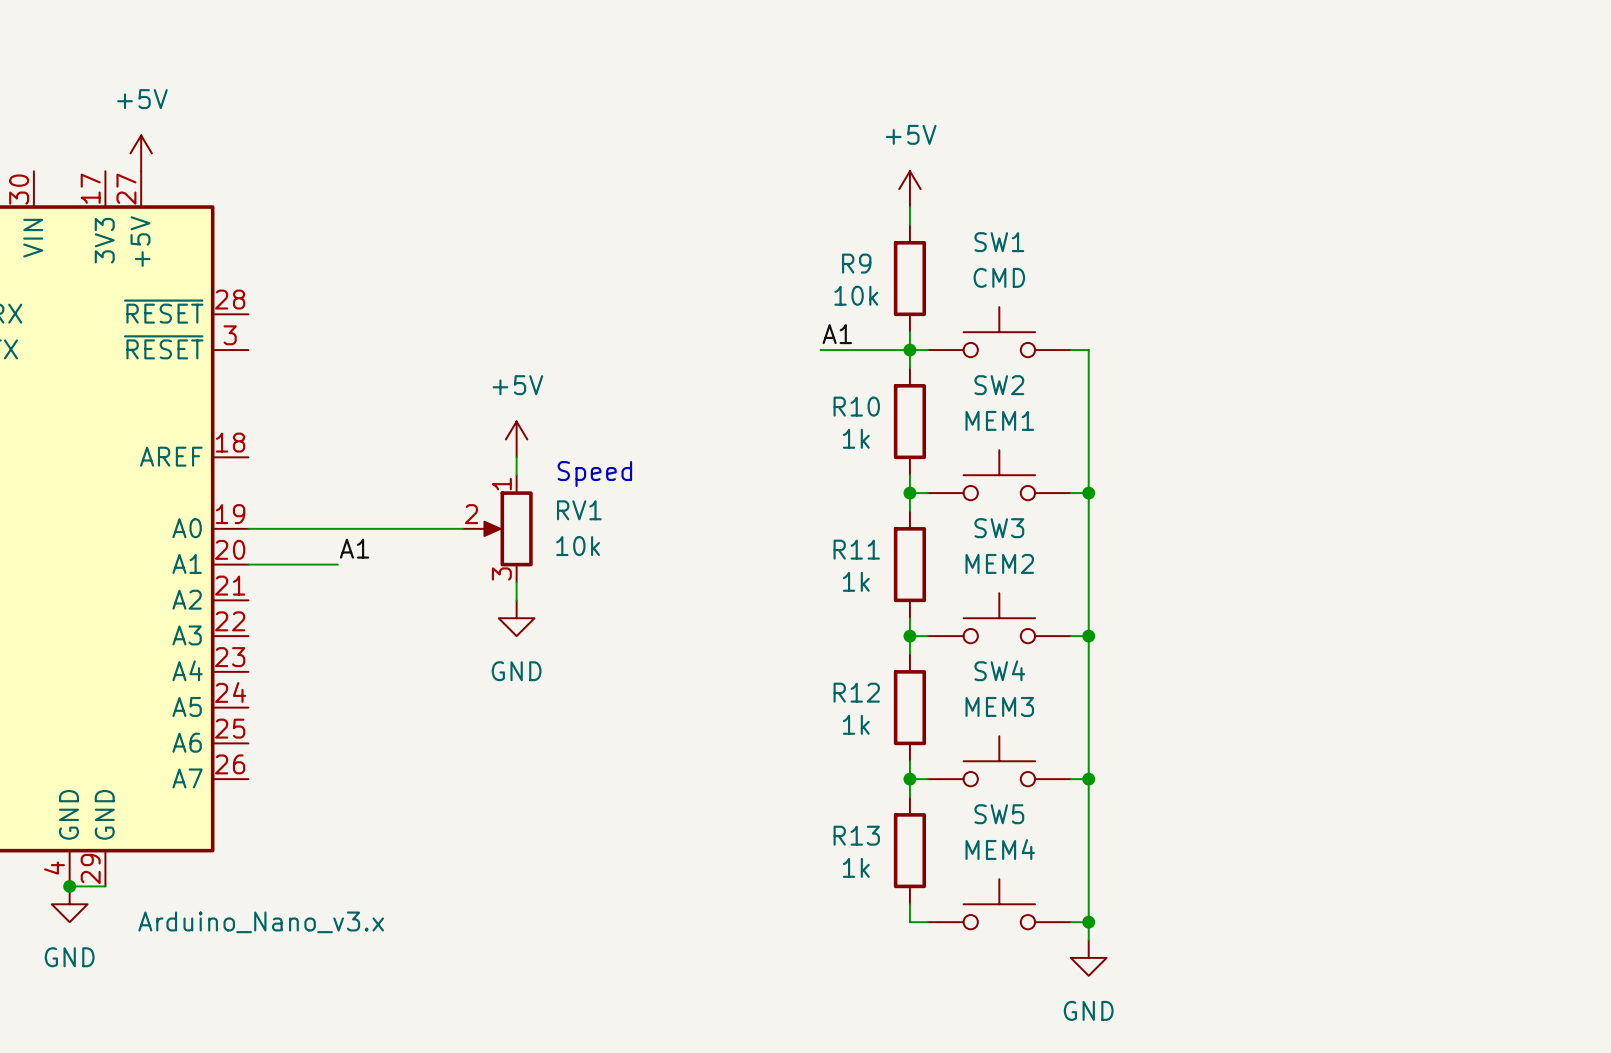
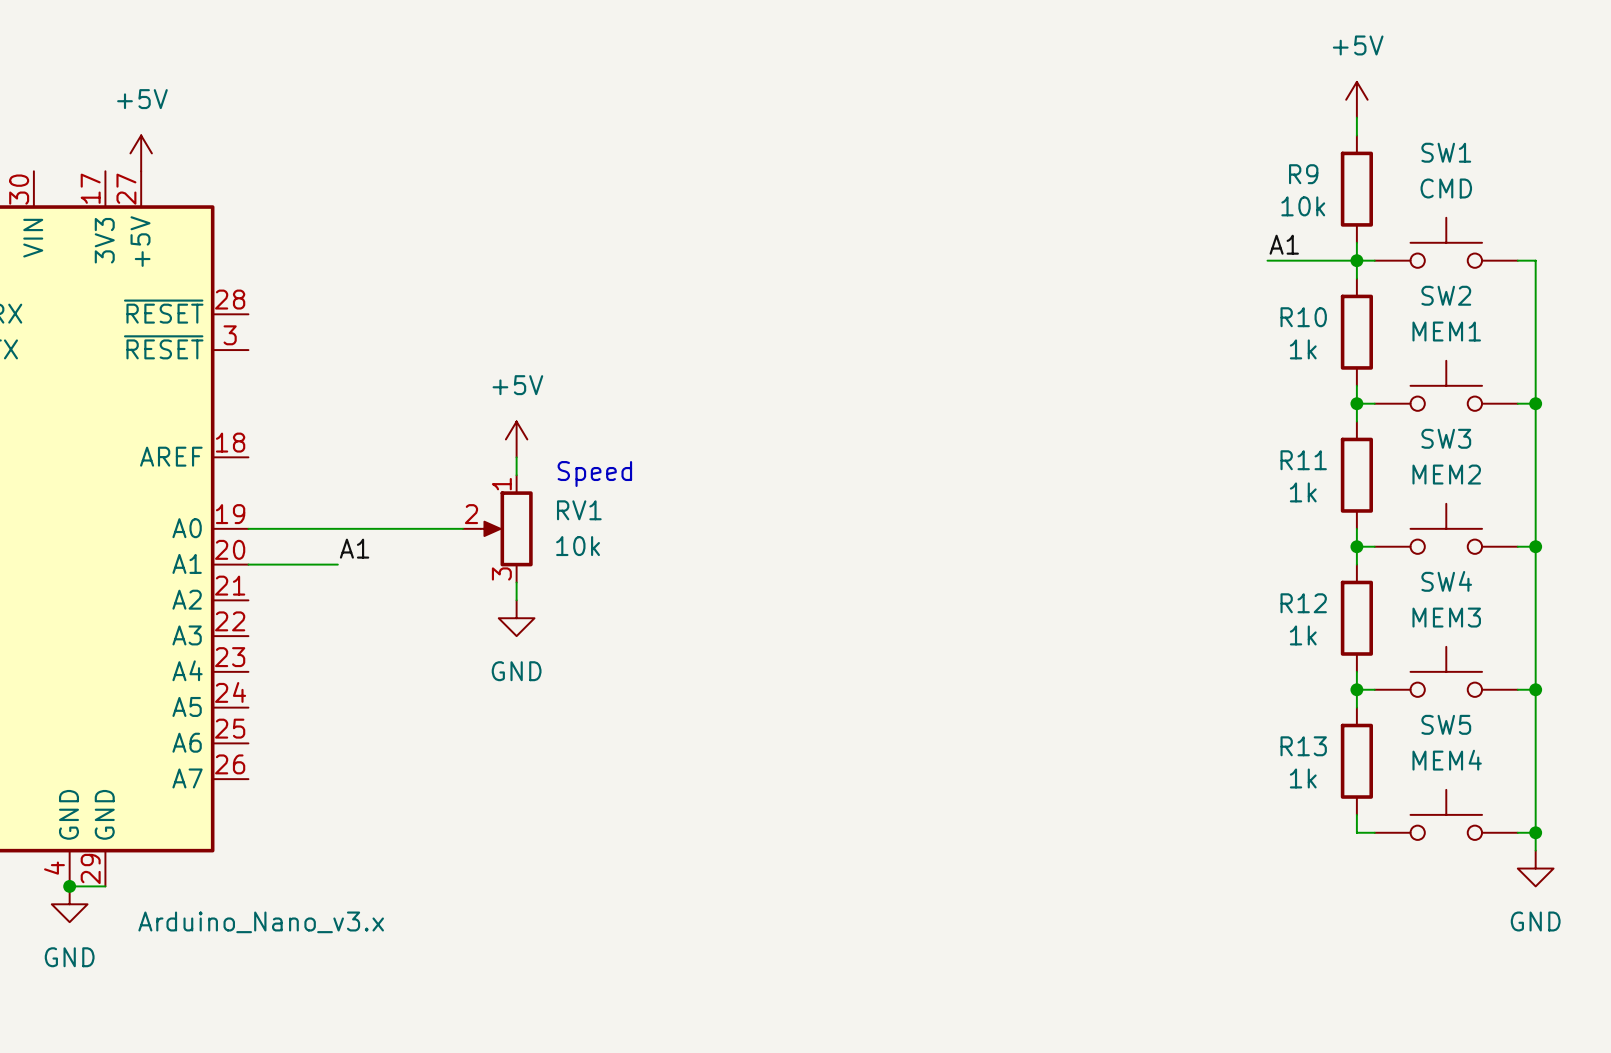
power symbol: none -> +5V (1356, 99)
wire: none -> (1356, 117) (1356, 135)
power symbol: +5V (909, 189) -> none
wire: (909, 207) (909, 224) -> none
wire: none -> (1356, 242) (1356, 278)
label: none -> A1 (1284, 244)
wire: none -> (1267, 260) (1374, 260)
junction: none -> (1356, 260)
wire: none -> (1517, 260) (1535, 260) (1535, 850)
R9 position: (909, 278) -> (1356, 189)
wire: (909, 332) (909, 367) -> none
SW1 position: (999, 332) -> (1446, 242)
label: A1 (837, 334) -> none
wire: (820, 350) (927, 350) -> none
junction: (909, 350) -> none
wire: (1070, 350) (1088, 350) (1088, 940) -> none
wire: none -> (1356, 385) (1356, 421)
junction: none -> (1356, 403)
wire: none -> (1517, 403) (1535, 403)
junction: none -> (1535, 403)
R10 position: (909, 421) -> (1356, 332)
wire: (909, 475) (909, 510) -> none
SW2 position: (999, 475) -> (1446, 385)
wire: (909, 493) (927, 493) -> none
junction: (909, 493) -> none
wire: (1070, 493) (1088, 493) -> (1356, 403) (1374, 403)
junction: (1088, 493) -> none
wire: none -> (1356, 528) (1356, 564)
junction: none -> (1356, 546)
wire: none -> (1517, 546) (1535, 546)
junction: none -> (1535, 546)
R11 position: (909, 564) -> (1356, 475)
wire: (909, 618) (909, 653) -> none
SW3 position: (999, 618) -> (1446, 528)
wire: (909, 636) (927, 636) -> none
junction: (909, 636) -> none
wire: (1070, 636) (1088, 636) -> (1356, 546) (1374, 546)
junction: (1088, 636) -> none
wire: none -> (1356, 671) (1356, 707)
junction: none -> (1356, 689)
wire: none -> (1517, 689) (1535, 689)
junction: none -> (1535, 689)
R12 position: (909, 707) -> (1356, 618)
wire: (909, 761) (909, 797) -> none
SW4 position: (999, 761) -> (1446, 671)
wire: (909, 779) (927, 779) -> none
junction: (909, 779) -> none
wire: (1070, 779) (1088, 779) -> (1356, 689) (1374, 689)
junction: (1088, 779) -> none
wire: none -> (1356, 814) (1356, 832) (1374, 832)
wire: none -> (1517, 832) (1535, 832)
junction: none -> (1535, 832)
R13 position: (909, 850) -> (1356, 761)
power symbol: none -> GND (1535, 868)
wire: (909, 904) (909, 922) (927, 922) -> none
SW5 position: (999, 904) -> (1446, 814)
wire: (1070, 922) (1088, 922) -> none
junction: (1088, 922) -> none
power symbol: GND (1088, 957) -> none

